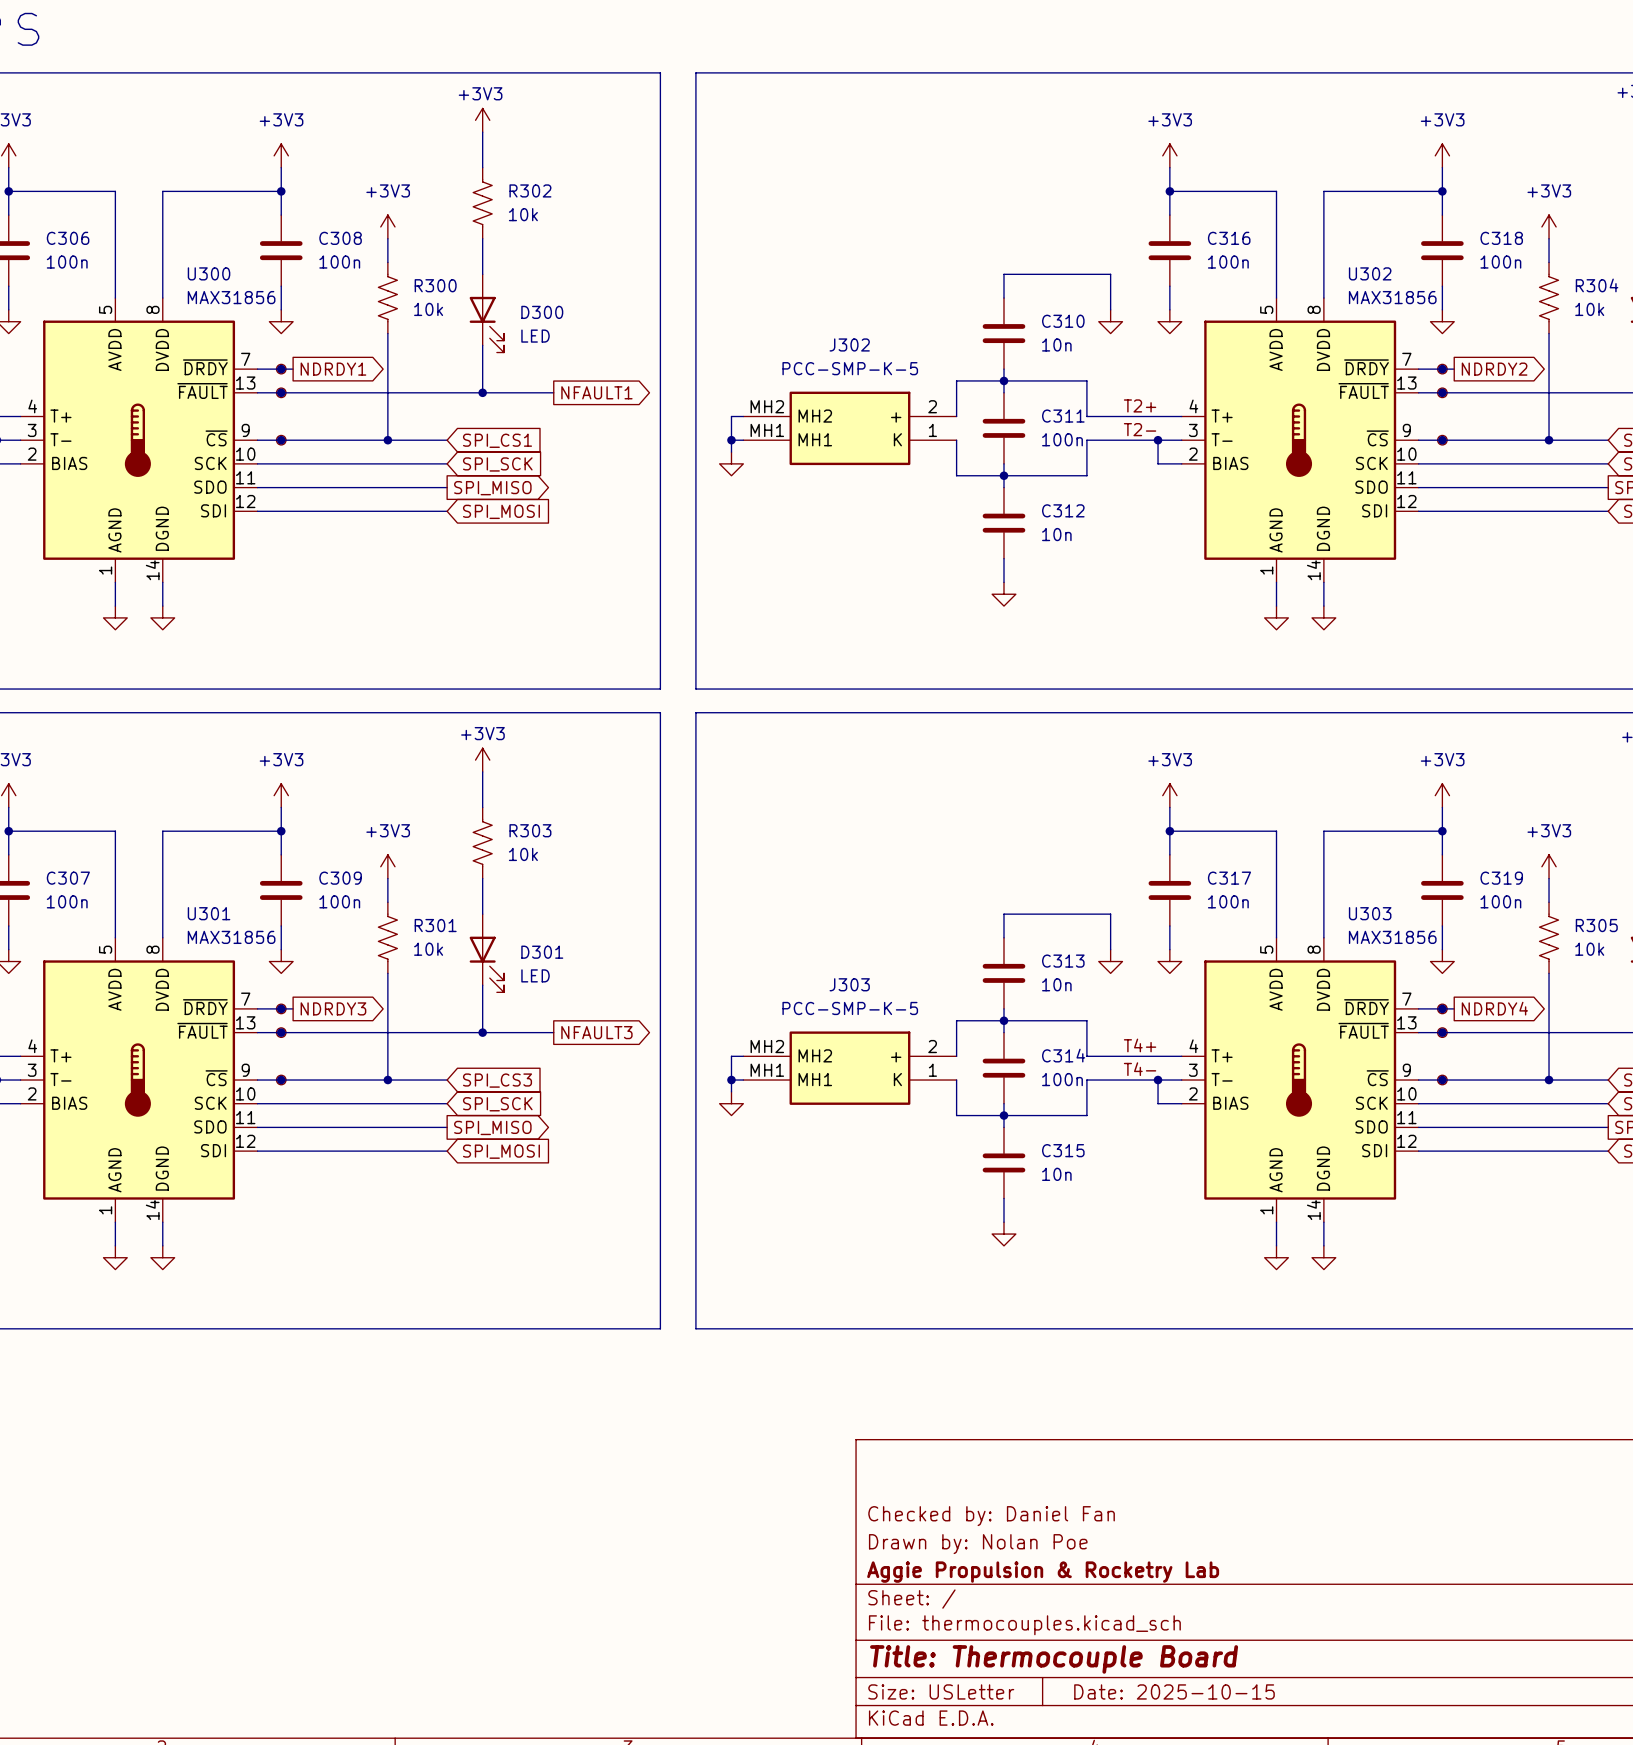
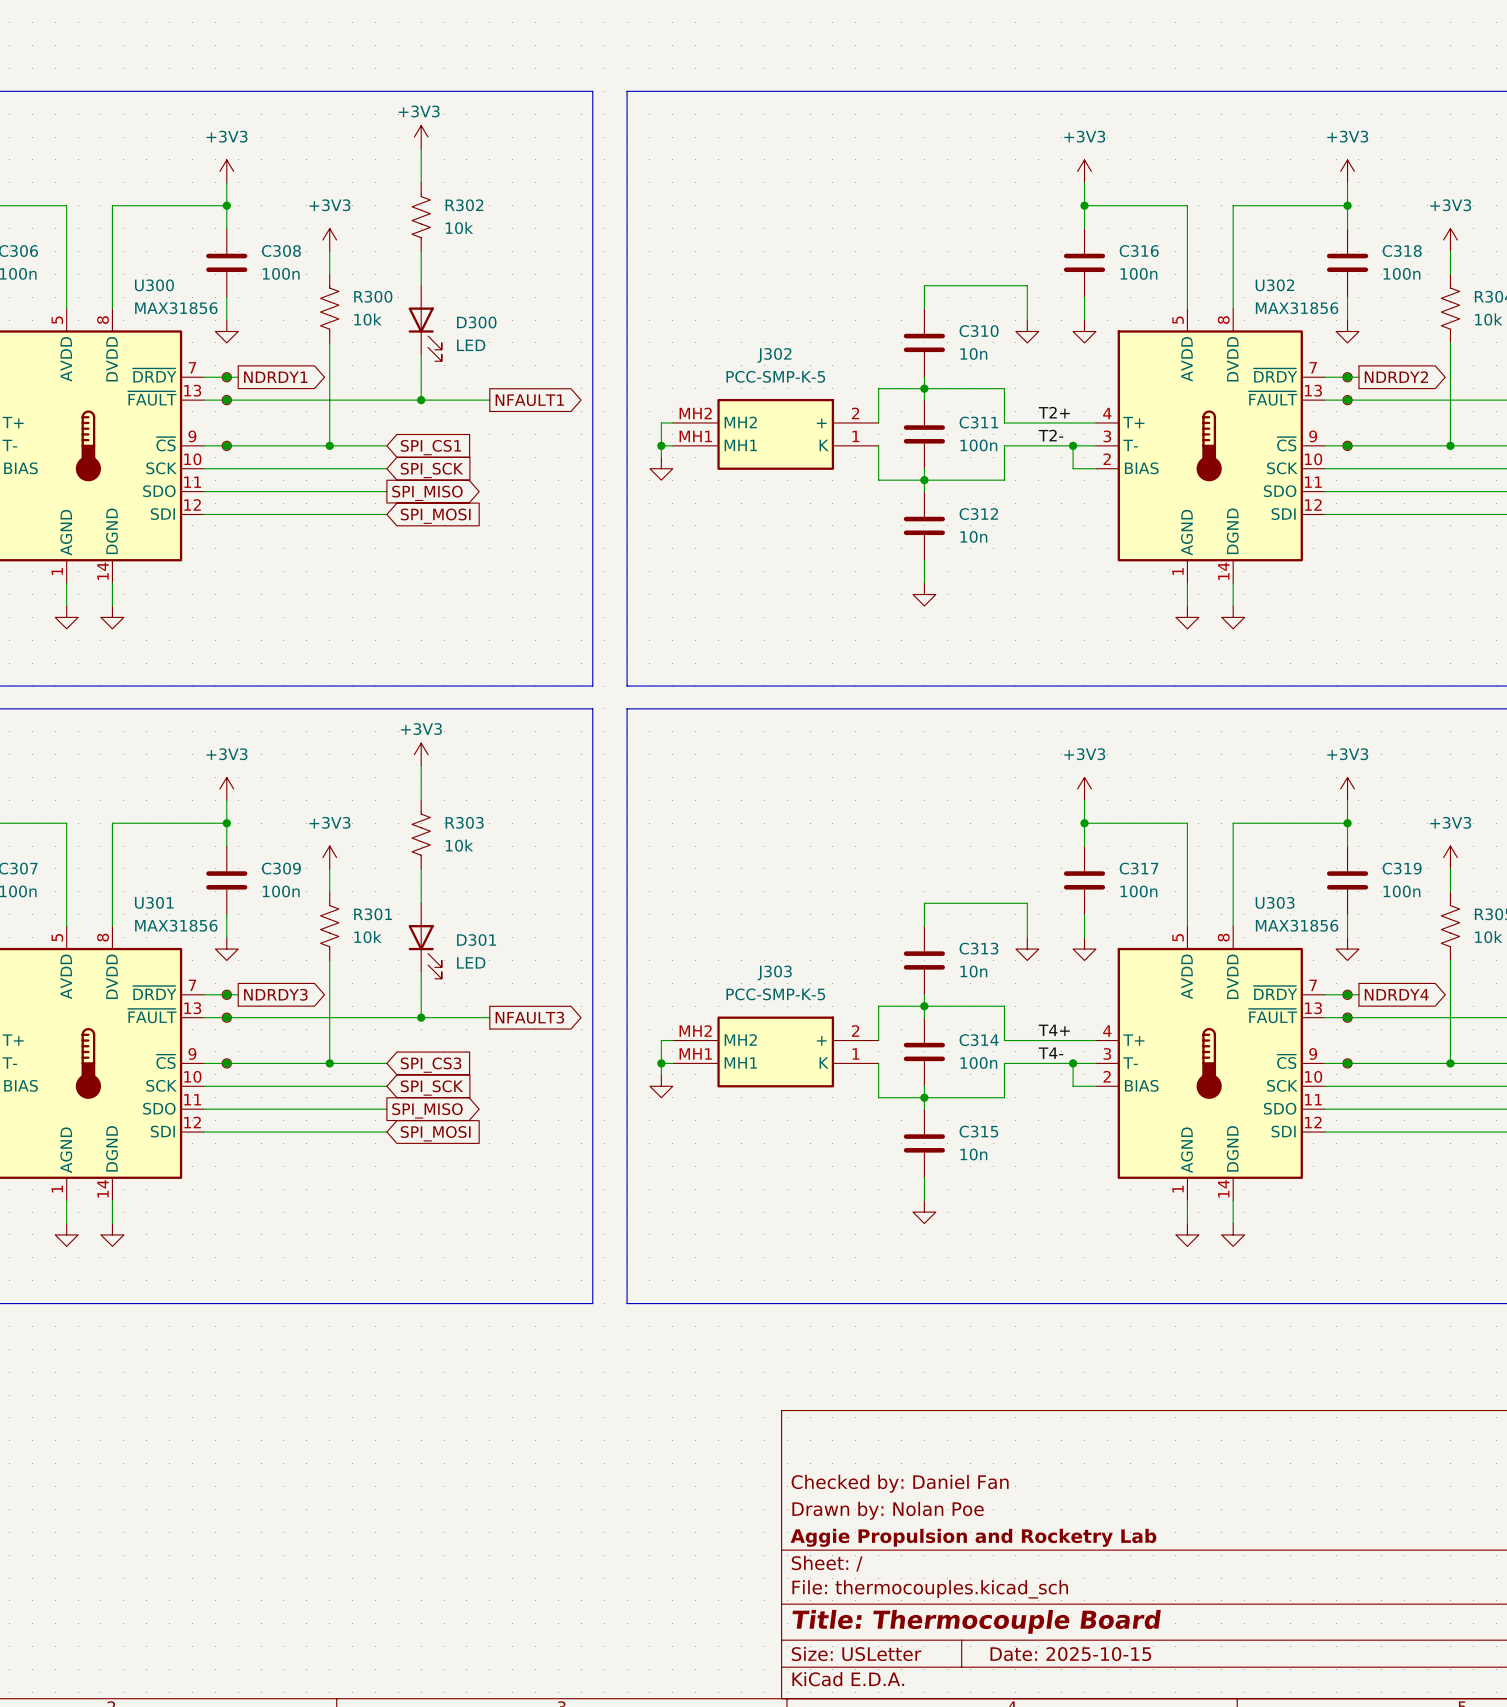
title block: Aggie Propulsion & Rocketry Lab (1043, 1572) -> Aggie Propulsion and Rocketry Lab (973, 1537)

